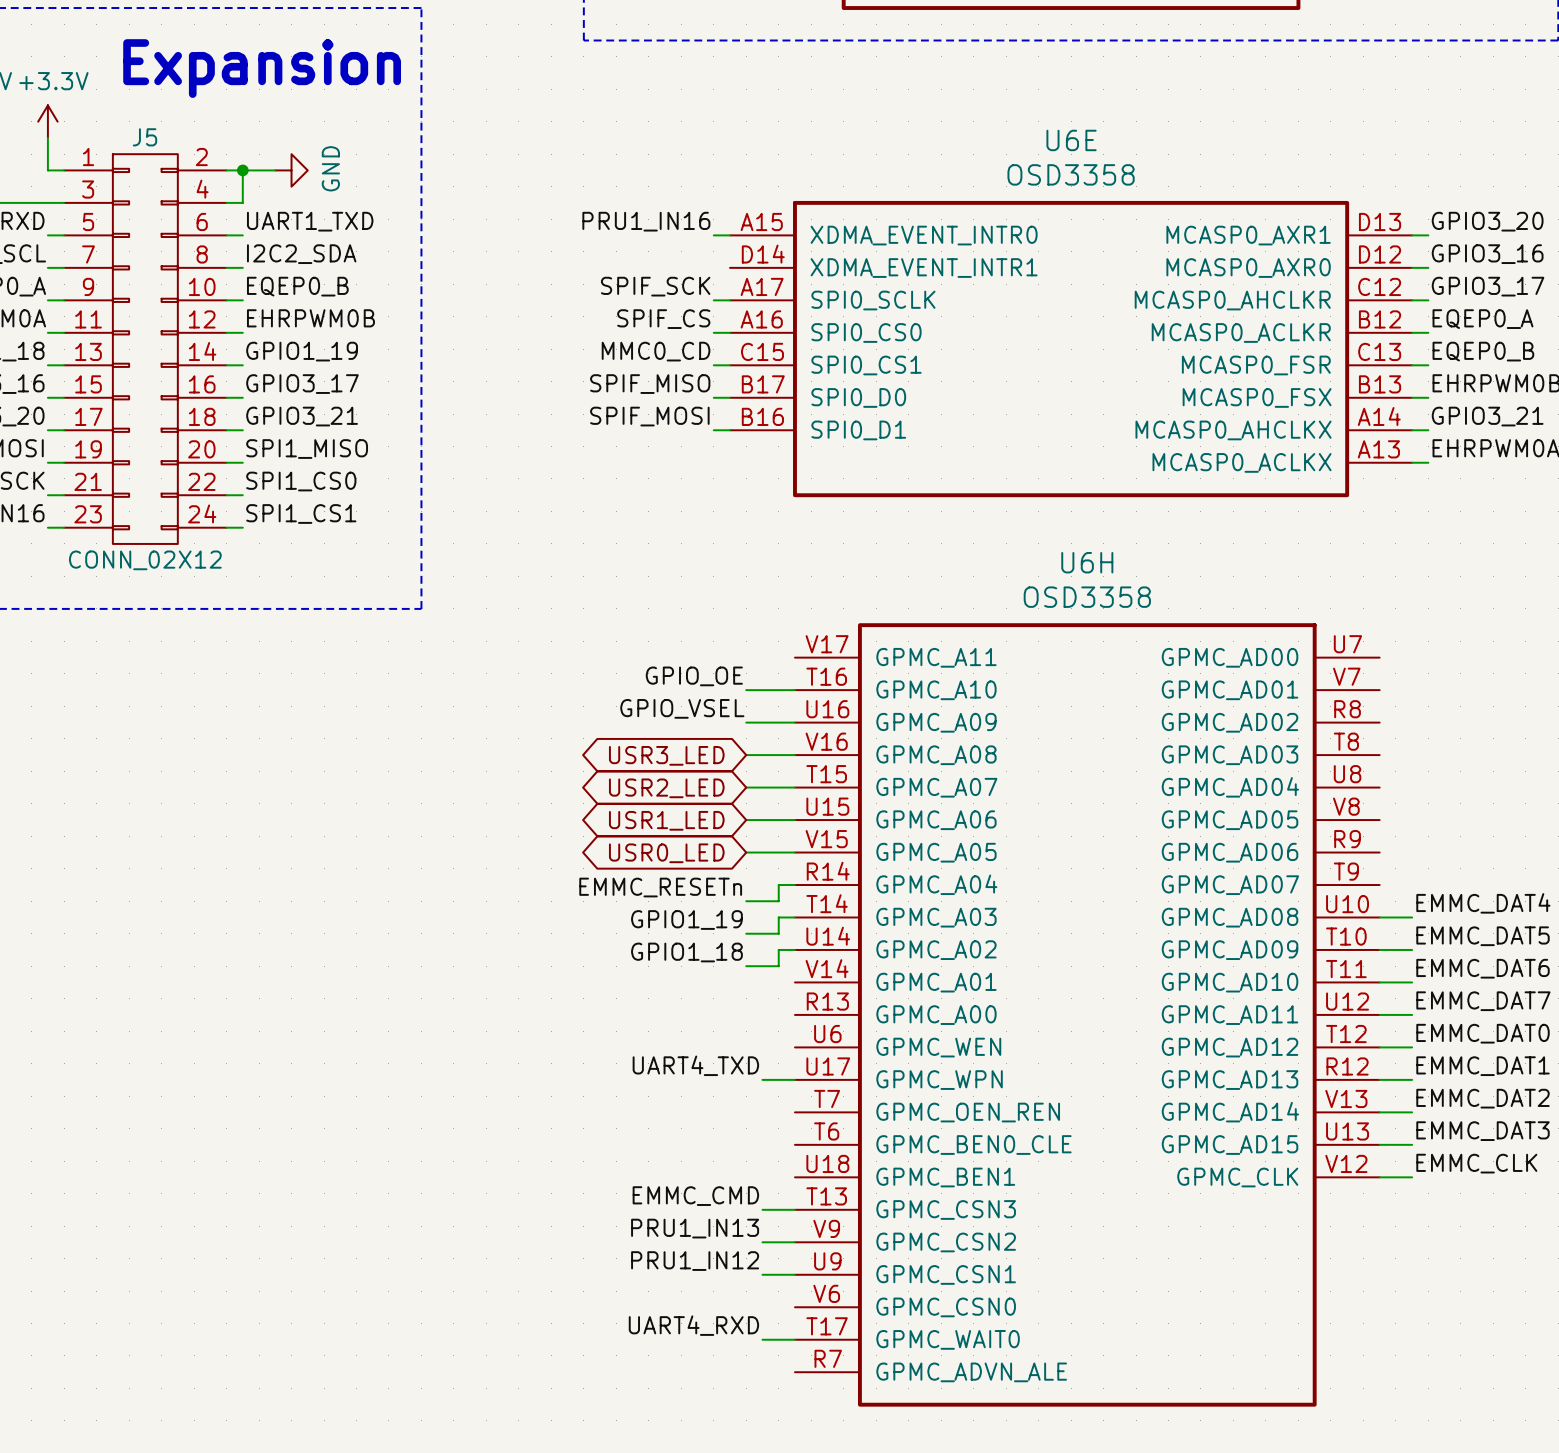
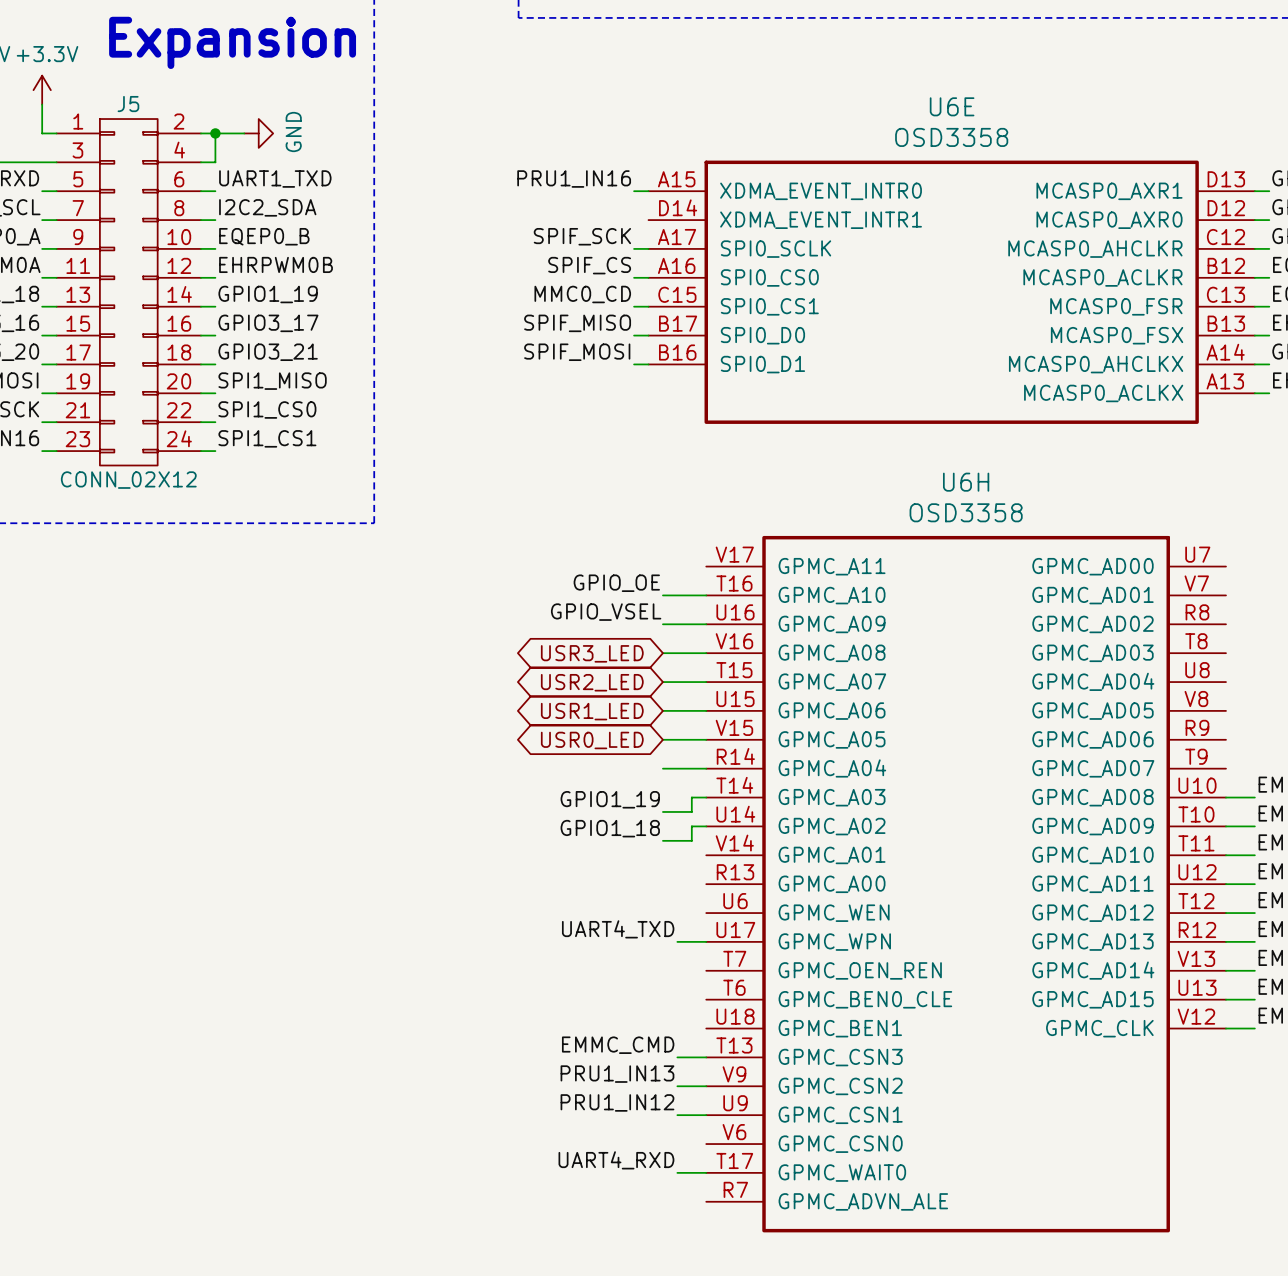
wire: (778, 885) (778, 901) (746, 901) -> (691, 768) (662, 768)
label: EMMC_RESETn (660, 887) -> none

